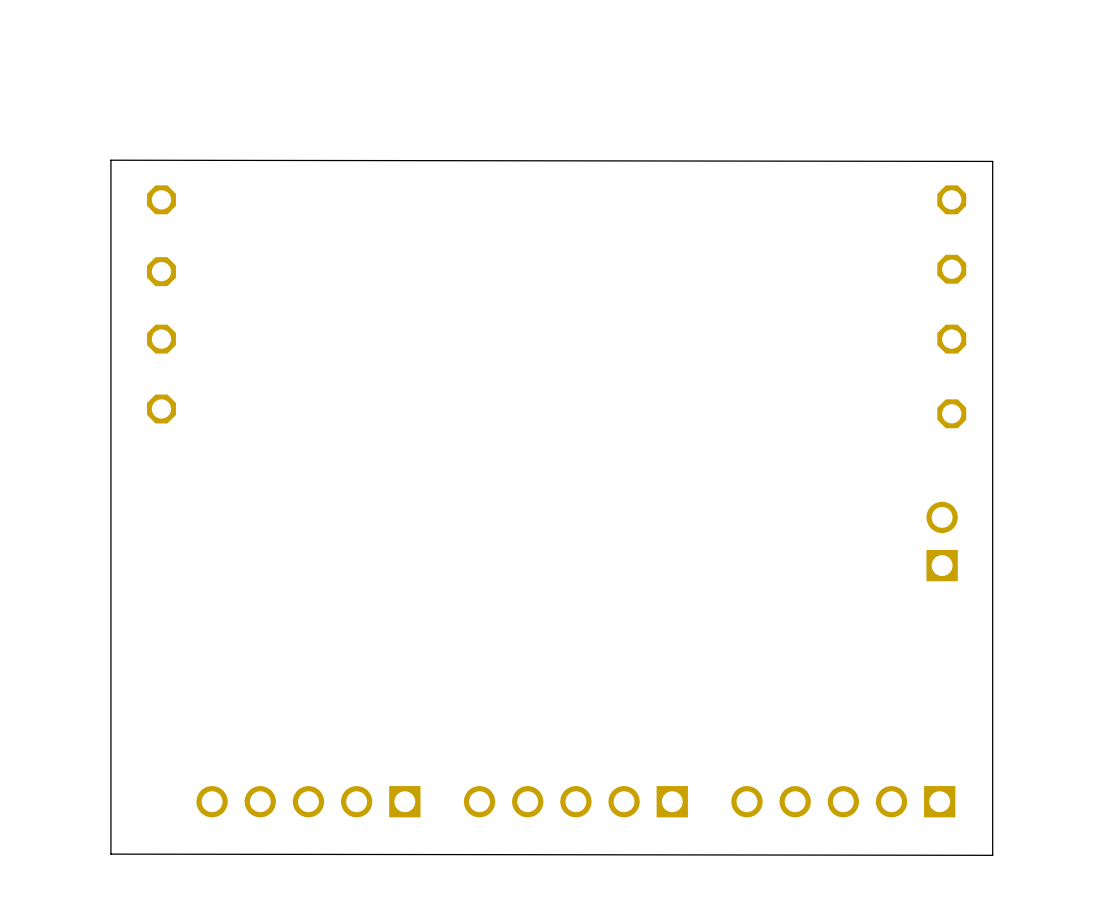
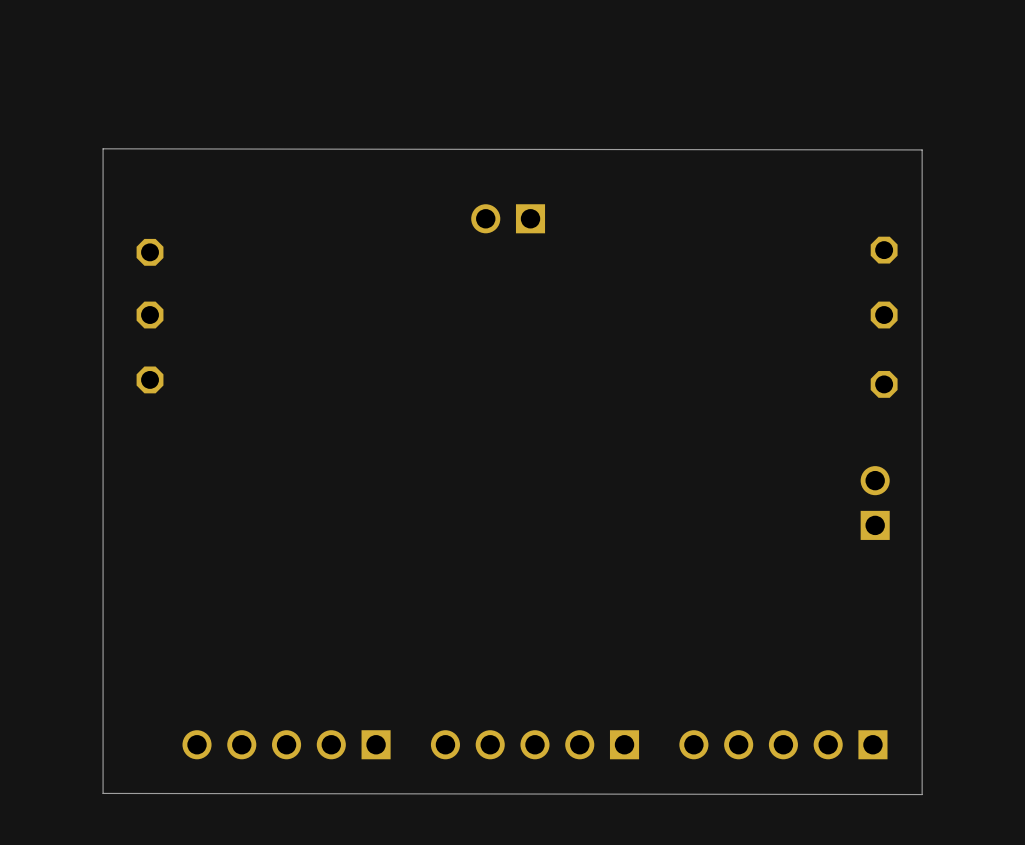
part: (161, 199) -> none
part: (951, 199) -> none
part: none -> (508, 218)

